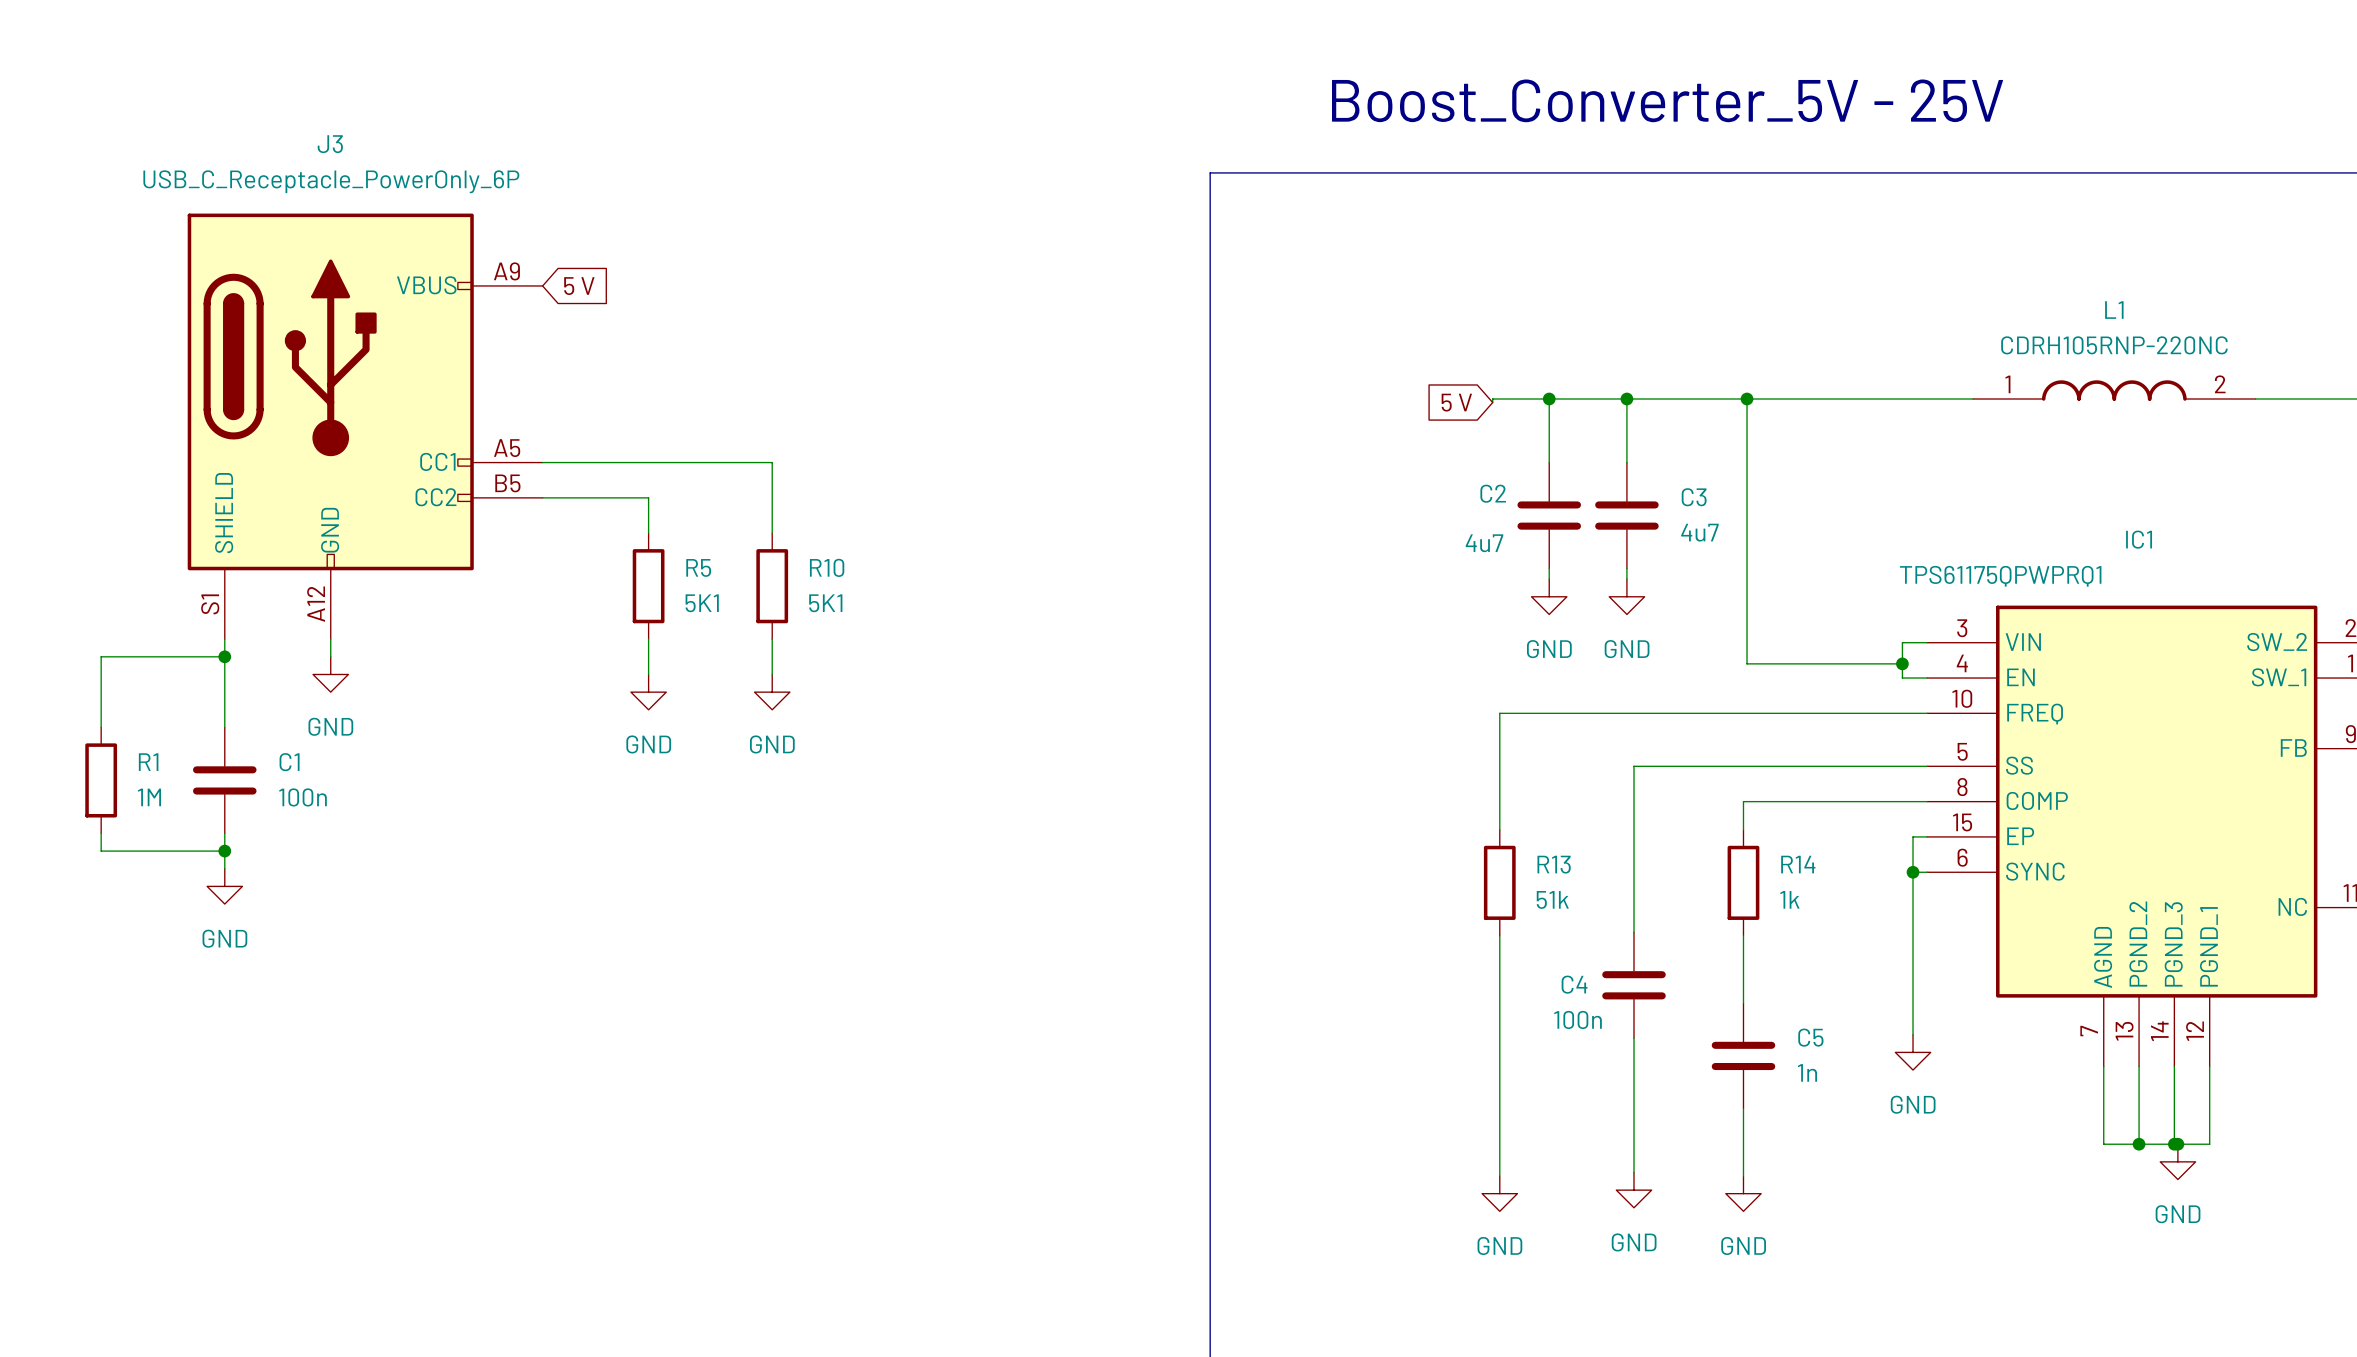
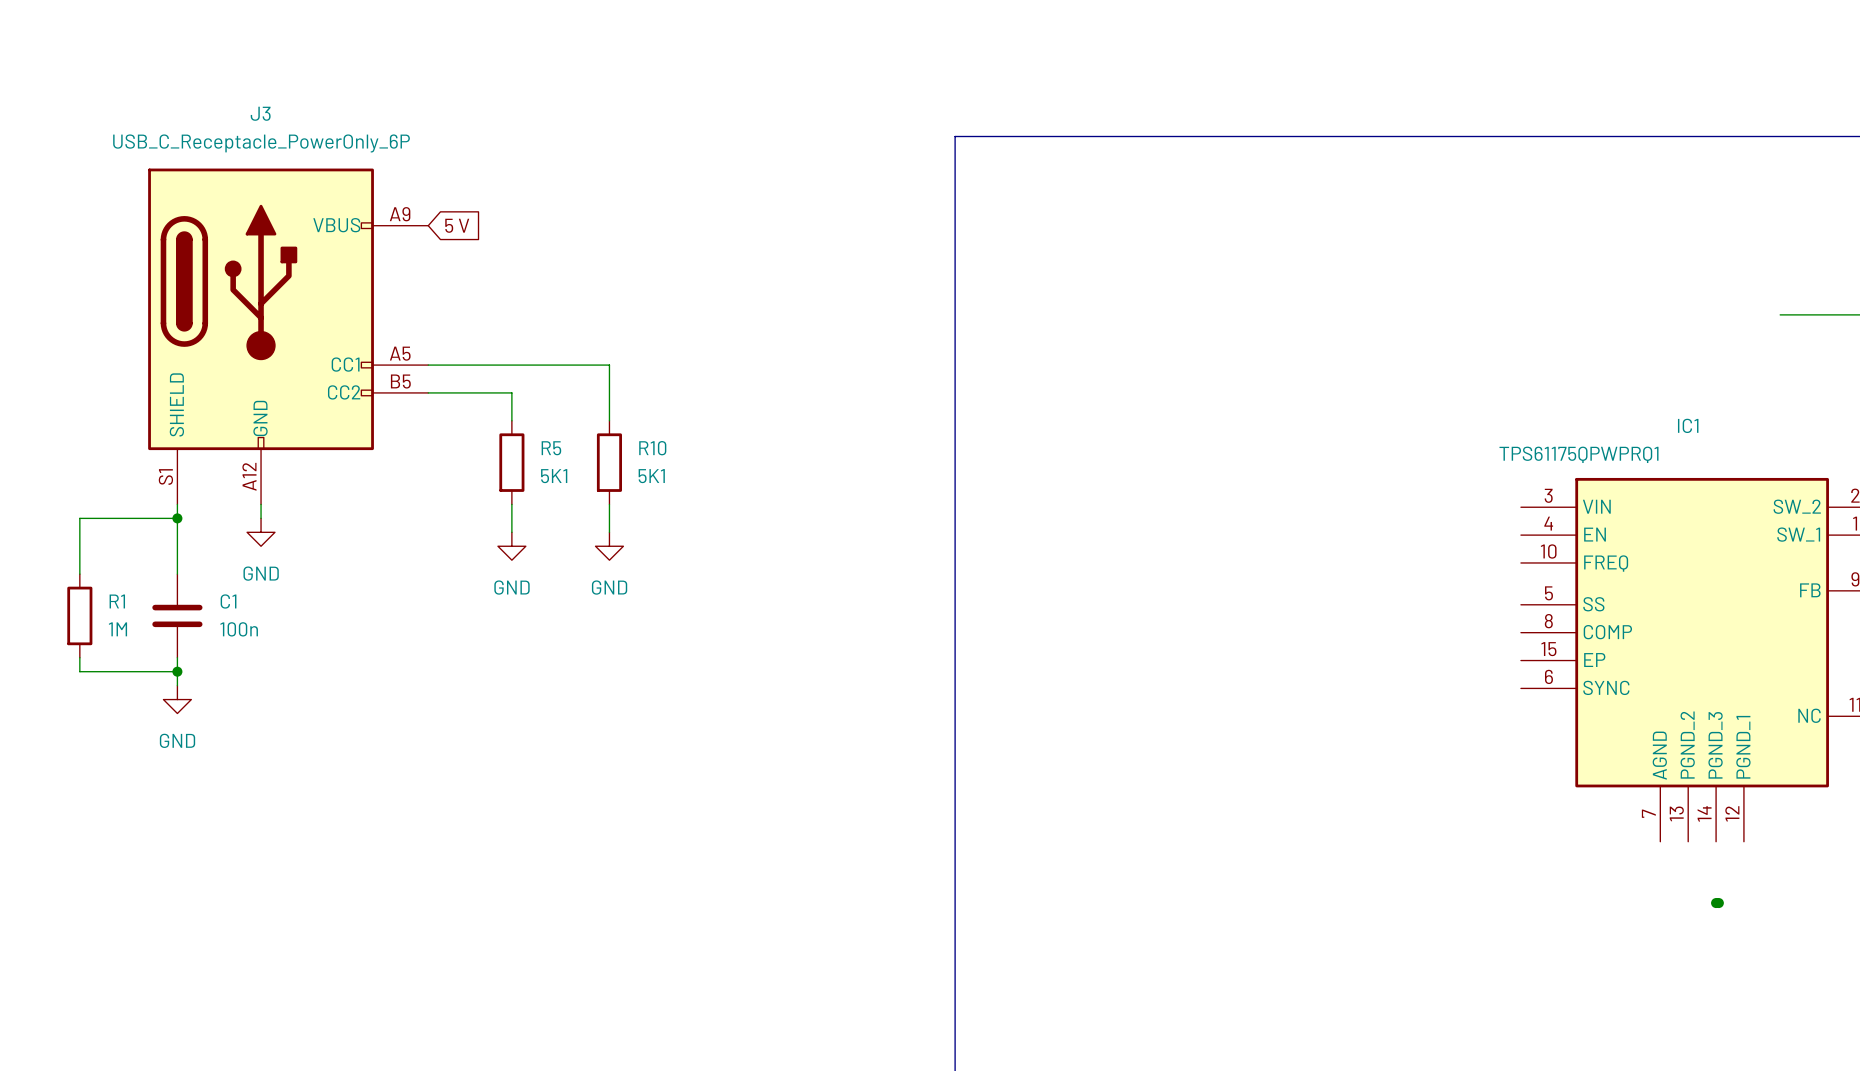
text: Boost_Converter_5V - 25V (1667, 100) -> none
L1: CDRH105RNP-220NC (2114, 390) -> none
wire: (1549, 398) (1549, 462) -> none
junction: (1549, 398) -> none
wire: (1626, 398) (1626, 462) -> none
junction: (1626, 398) -> none
wire: (1747, 398) (1747, 663) (1902, 663) -> none
junction: (1747, 398) -> none
wire: (1973, 398) (1492, 398) (1492, 402) -> none
global label: 5 V (1456, 402) -> none
C2: 4u7 (1549, 515) -> none
C3: 4u7 (1626, 515) -> none
wire: (1549, 568) (1549, 579) -> none
wire: (1626, 568) (1626, 579) -> none
power symbol: GND (1549, 596) -> none
power symbol: GND (1626, 596) -> none
wire: (1927, 642) (1902, 642) (1902, 678) (1927, 678) -> none
junction: (1902, 663) -> none
wire: (1927, 713) (1499, 713) (1499, 829) -> none
wire: (1927, 766) (1633, 766) (1633, 932) -> none
wire: (1927, 801) (1743, 801) (1743, 829) -> none
wire: (1927, 836) (1913, 836) (1913, 1034) -> none
wire: (1913, 872) (1927, 872) -> none
junction: (1913, 872) -> none
R13: 51k (1499, 882) -> none
R14: 1k (1743, 882) -> none
wire: (1499, 935) (1499, 1176) -> none
wire: (1743, 935) (1743, 1002) -> none
C4: 100n (1633, 985) -> none
wire: (1633, 1038) (1633, 1172) -> none
power symbol: GND (1913, 1052) -> none
C5: 1n (1743, 1055) -> none
wire: (2103, 1066) (2103, 1144) (2209, 1144) (2209, 1066) -> none
wire: (2139, 1066) (2139, 1144) -> none
wire: (2174, 1066) (2174, 1144) -> none
wire: (1743, 1108) (1743, 1176) -> none
junction: (2139, 1144) -> none
power symbol: GND (2177, 1161) -> none
power symbol: GND (1633, 1190) -> none
power symbol: GND (1499, 1193) -> none
power symbol: GND (1743, 1193) -> none

